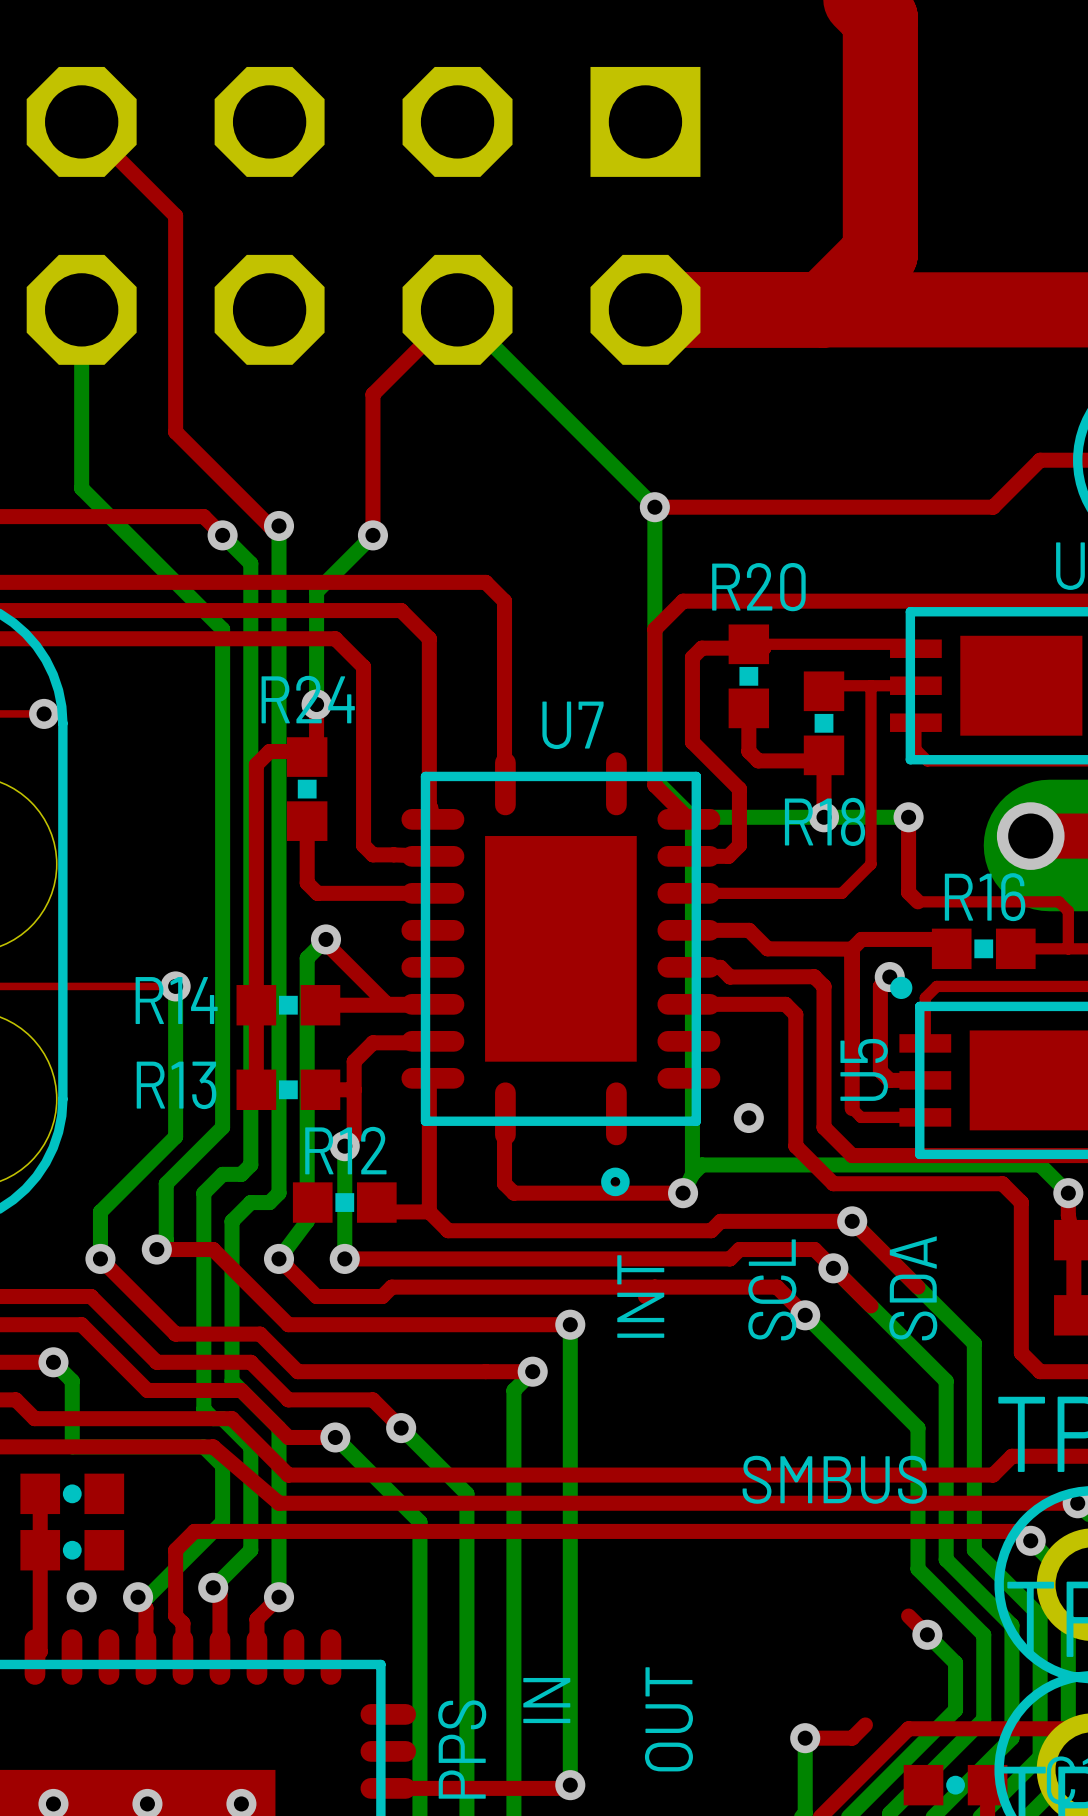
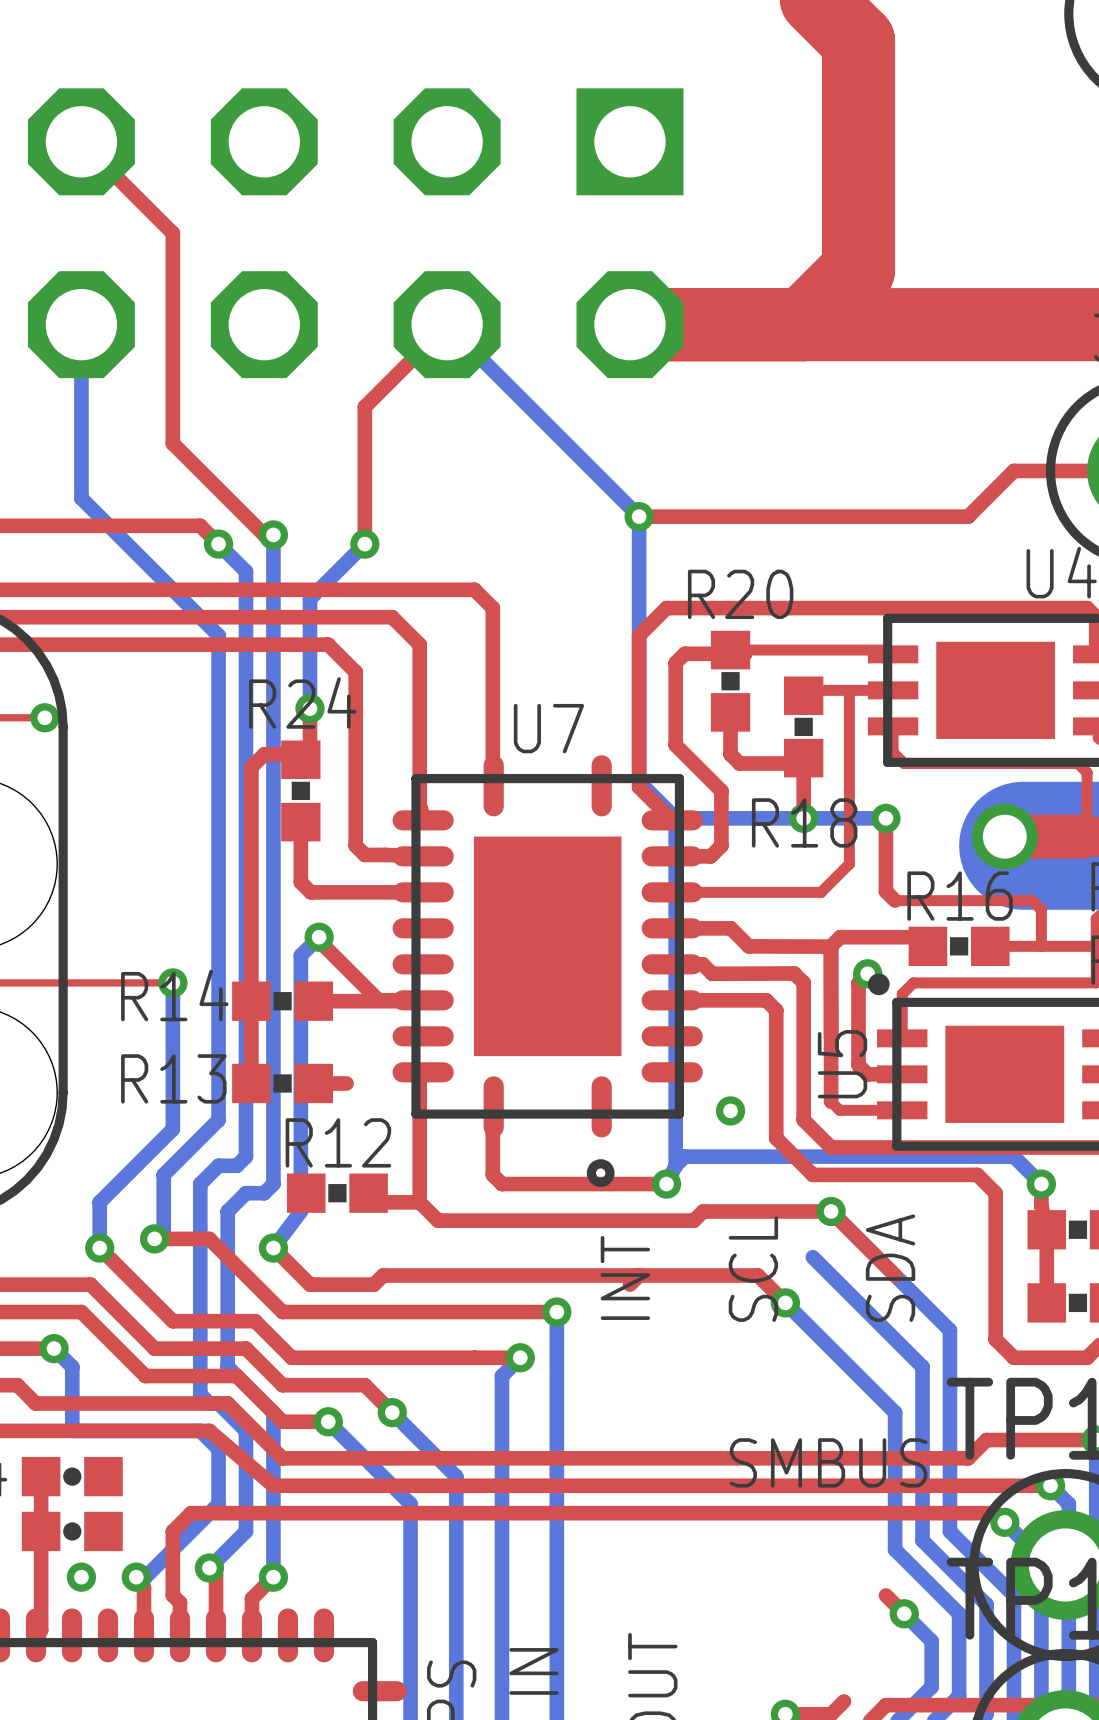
top track: (432, 1041) (372, 1042) (354, 1061) (354, 1136) (344, 1146) -> none
bottom track: (344, 1146) (344, 1258) -> none
via: (344, 1146) -> none
top track: (344, 1258) (730, 1258) (739, 1249) (814, 1249) (870, 1305) -> none
via: (344, 1258) -> none
via: (833, 1268) -> none

